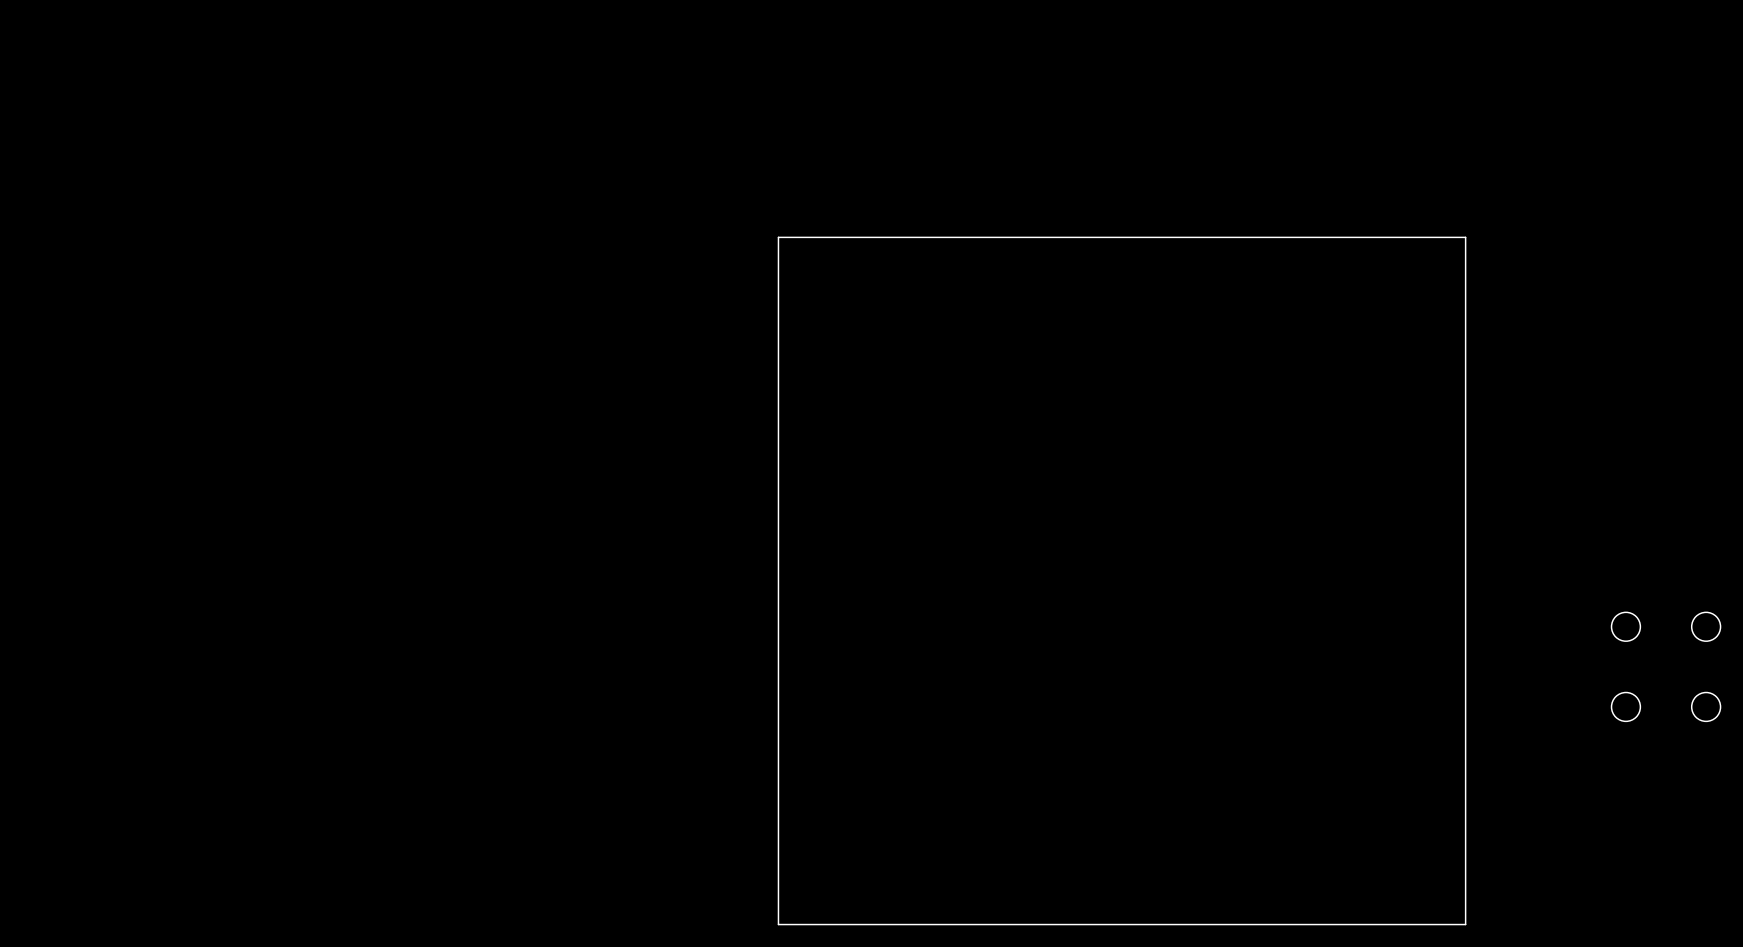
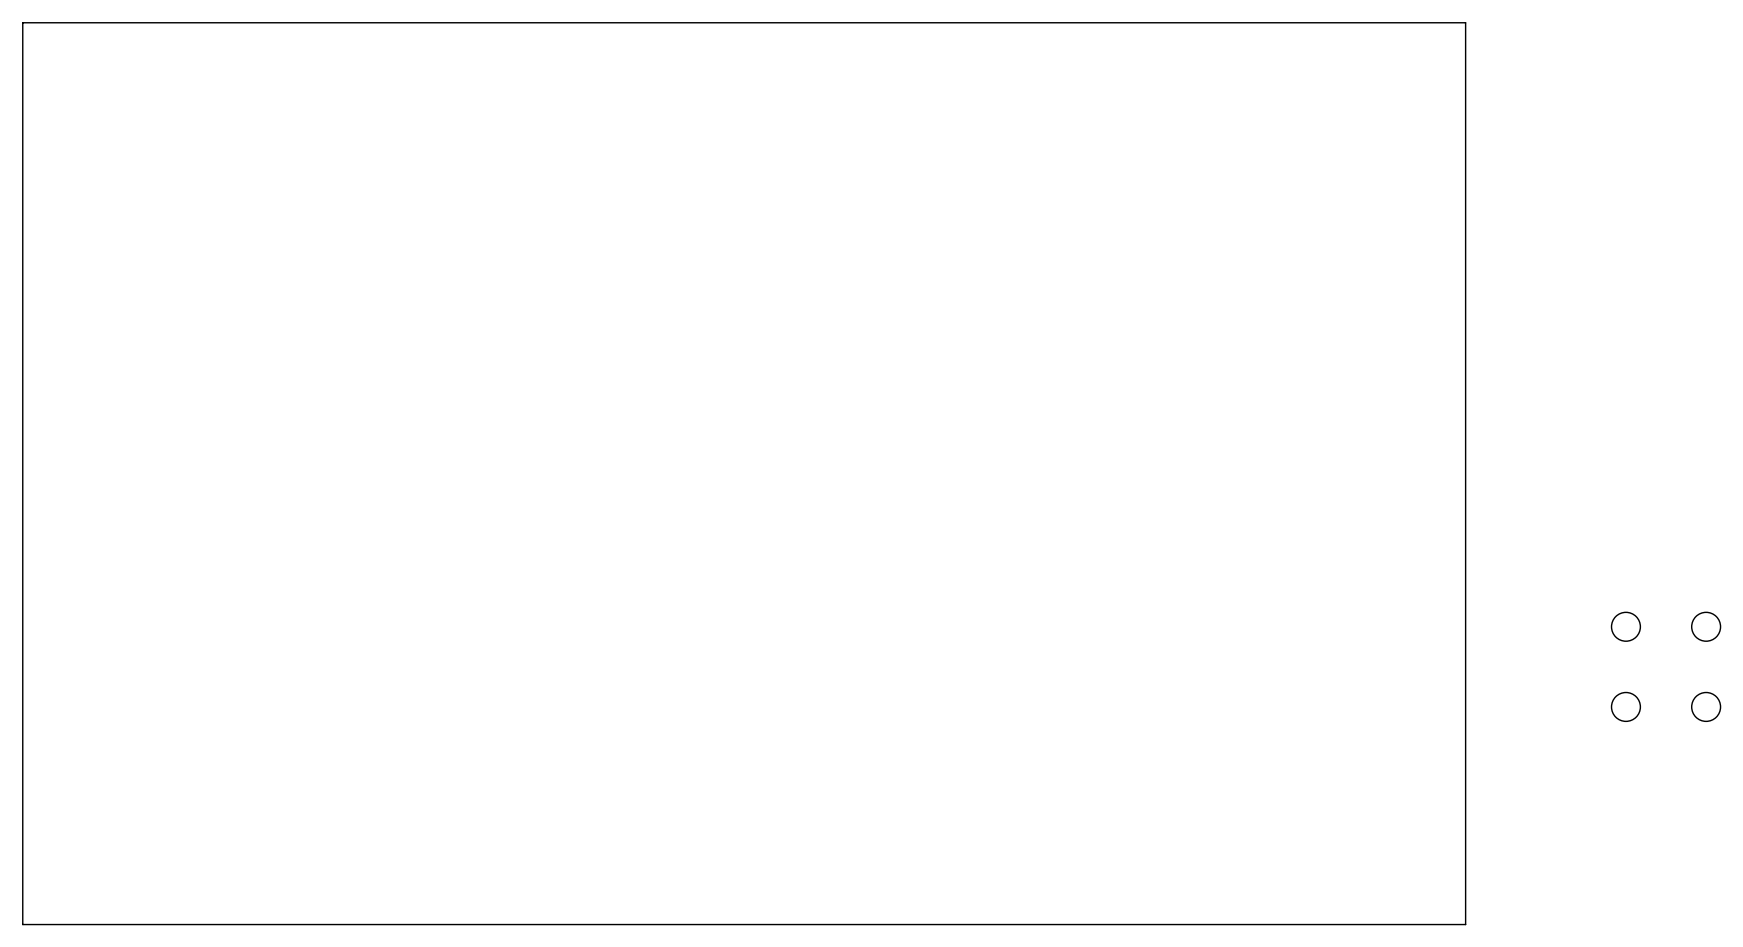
board edge: (1465, 237) (778, 237) (778, 924) -> (1465, 237) (1465, 22) (22, 22) (22, 924) (778, 924)

